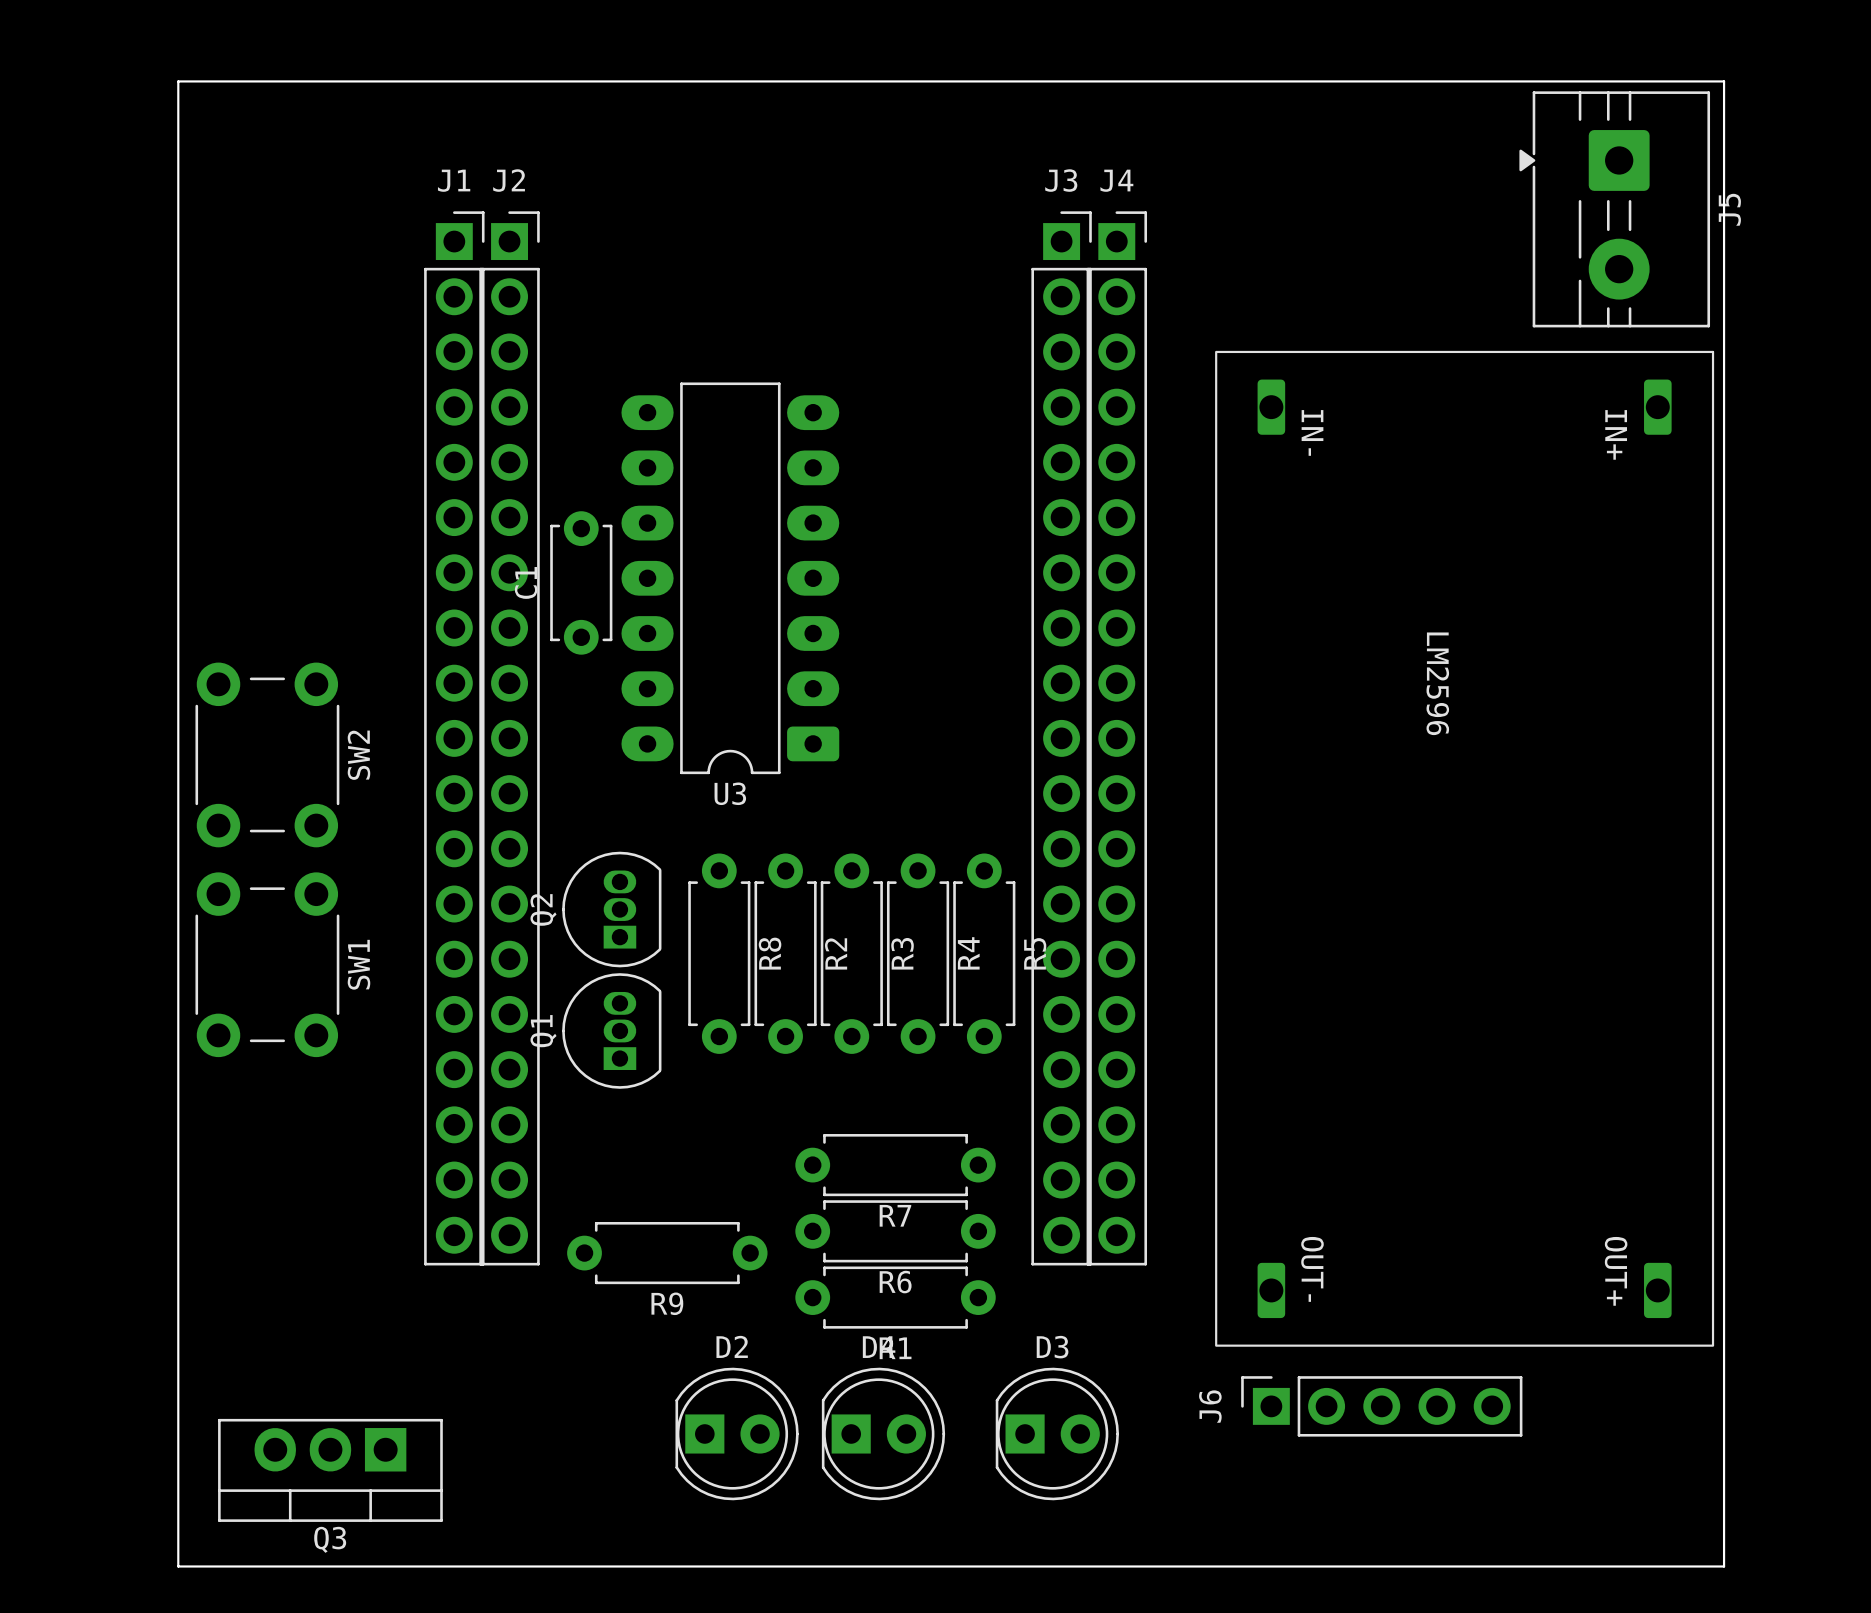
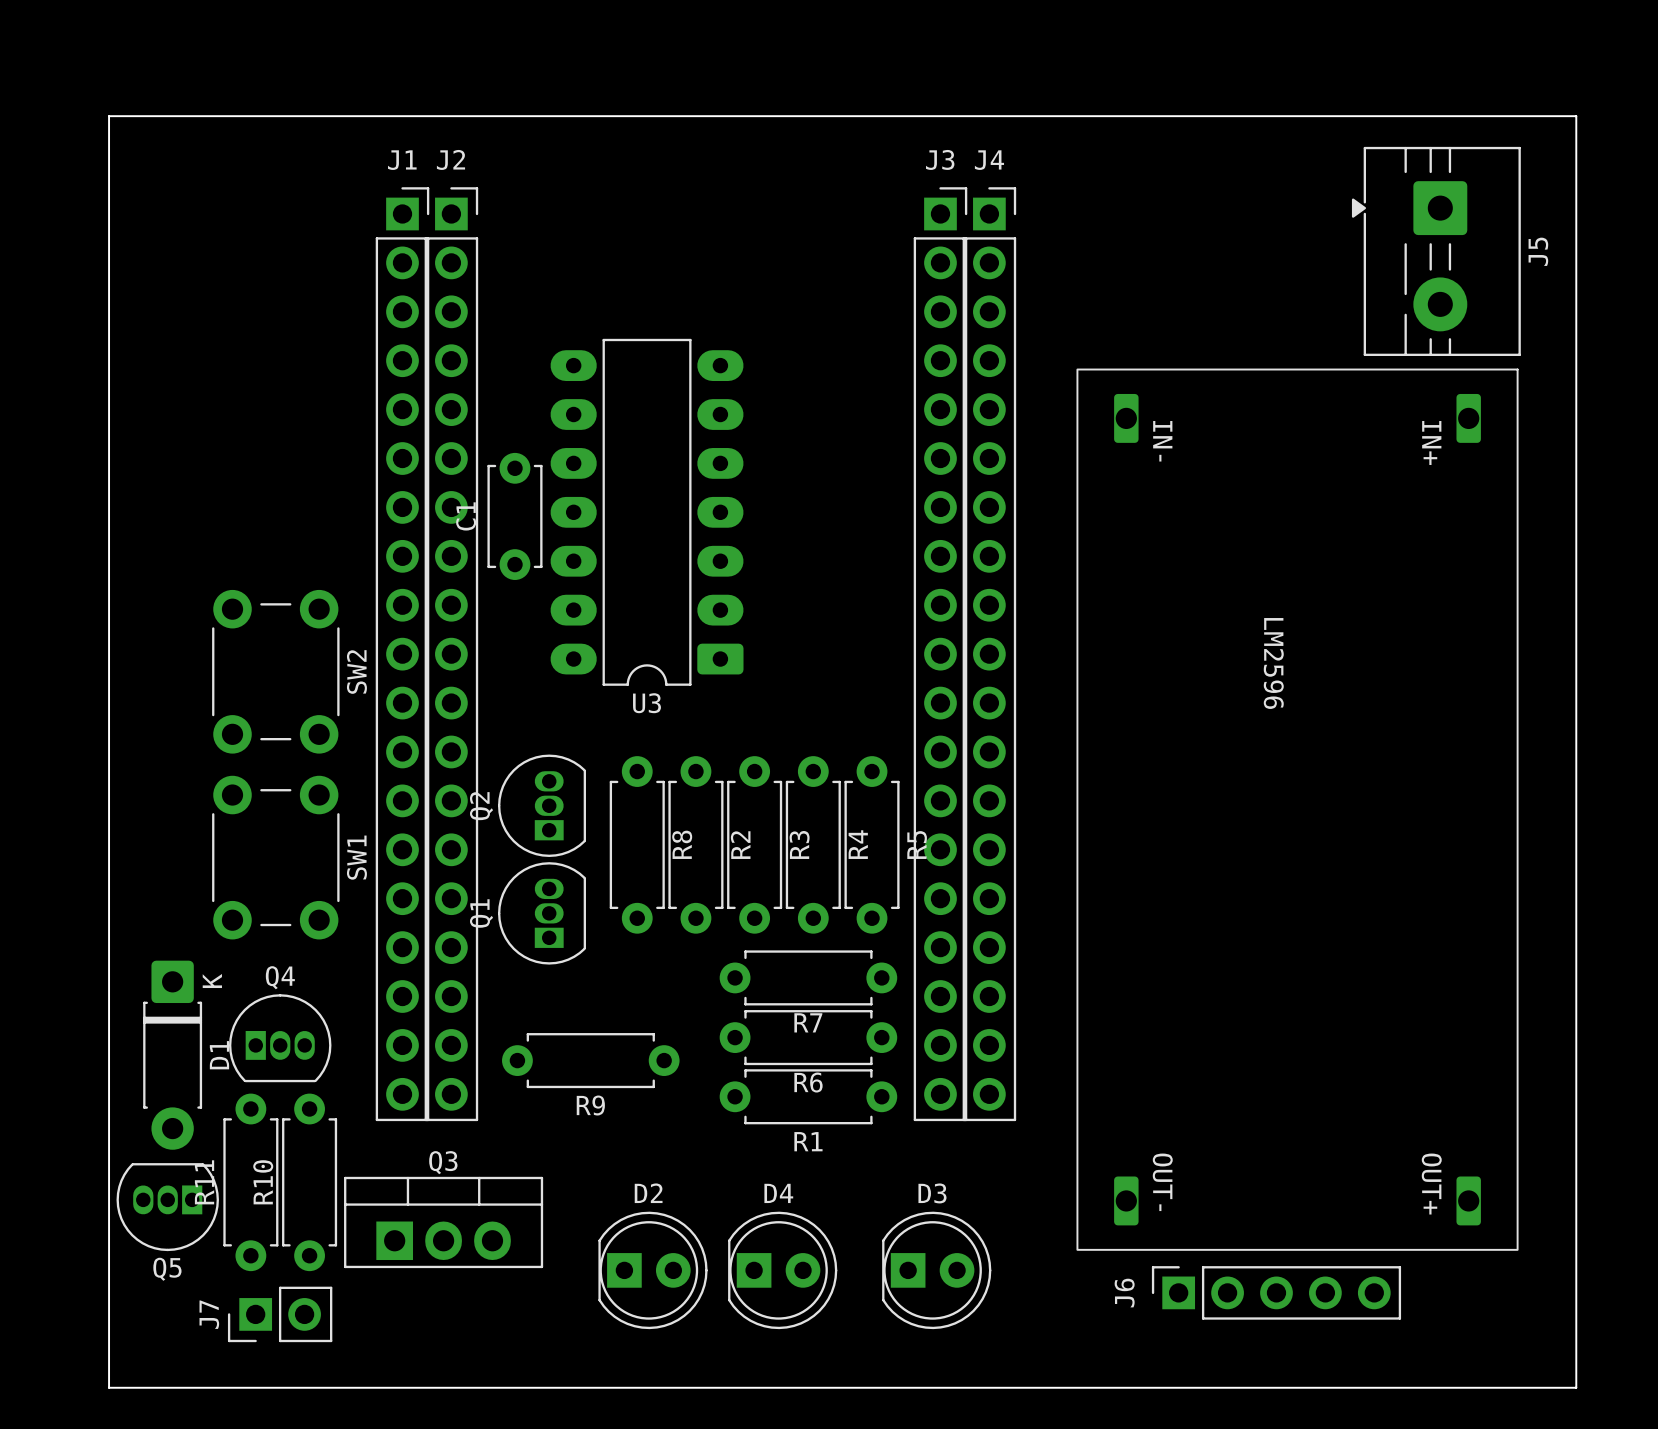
J5 position: (1614, 209) -> (1436, 251)
SW2 position: (267, 754) -> (275, 671)
LM2596 position: (1464, 848) -> (1297, 809)
SW1 position: (267, 964) -> (275, 857)
R7 position: (895, 1165) -> (808, 977)
Q4: none -> (280, 1038)
D1: none -> (172, 1055)
R6 position: (895, 1231) -> (808, 1037)
R9 position: (667, 1253) -> (590, 1060)
R1 position: (895, 1297) -> (808, 1096)
R11: none -> (250, 1182)
R10: none -> (309, 1182)
Q5: none -> (167, 1207)
J6 position: (1381, 1406) -> (1276, 1292)
Q3 rotation: 0° (330, 1470) -> 180° (443, 1222)
Q3 position: (330, 1470) -> (443, 1222)
J7: none -> (280, 1314)
board edge: (178, 1566) (178, 81) (1724, 81) (1724, 1566) -> (157, 1387) (109, 1387) (109, 116) (1576, 116) (1576, 1387) (1527, 1387)

